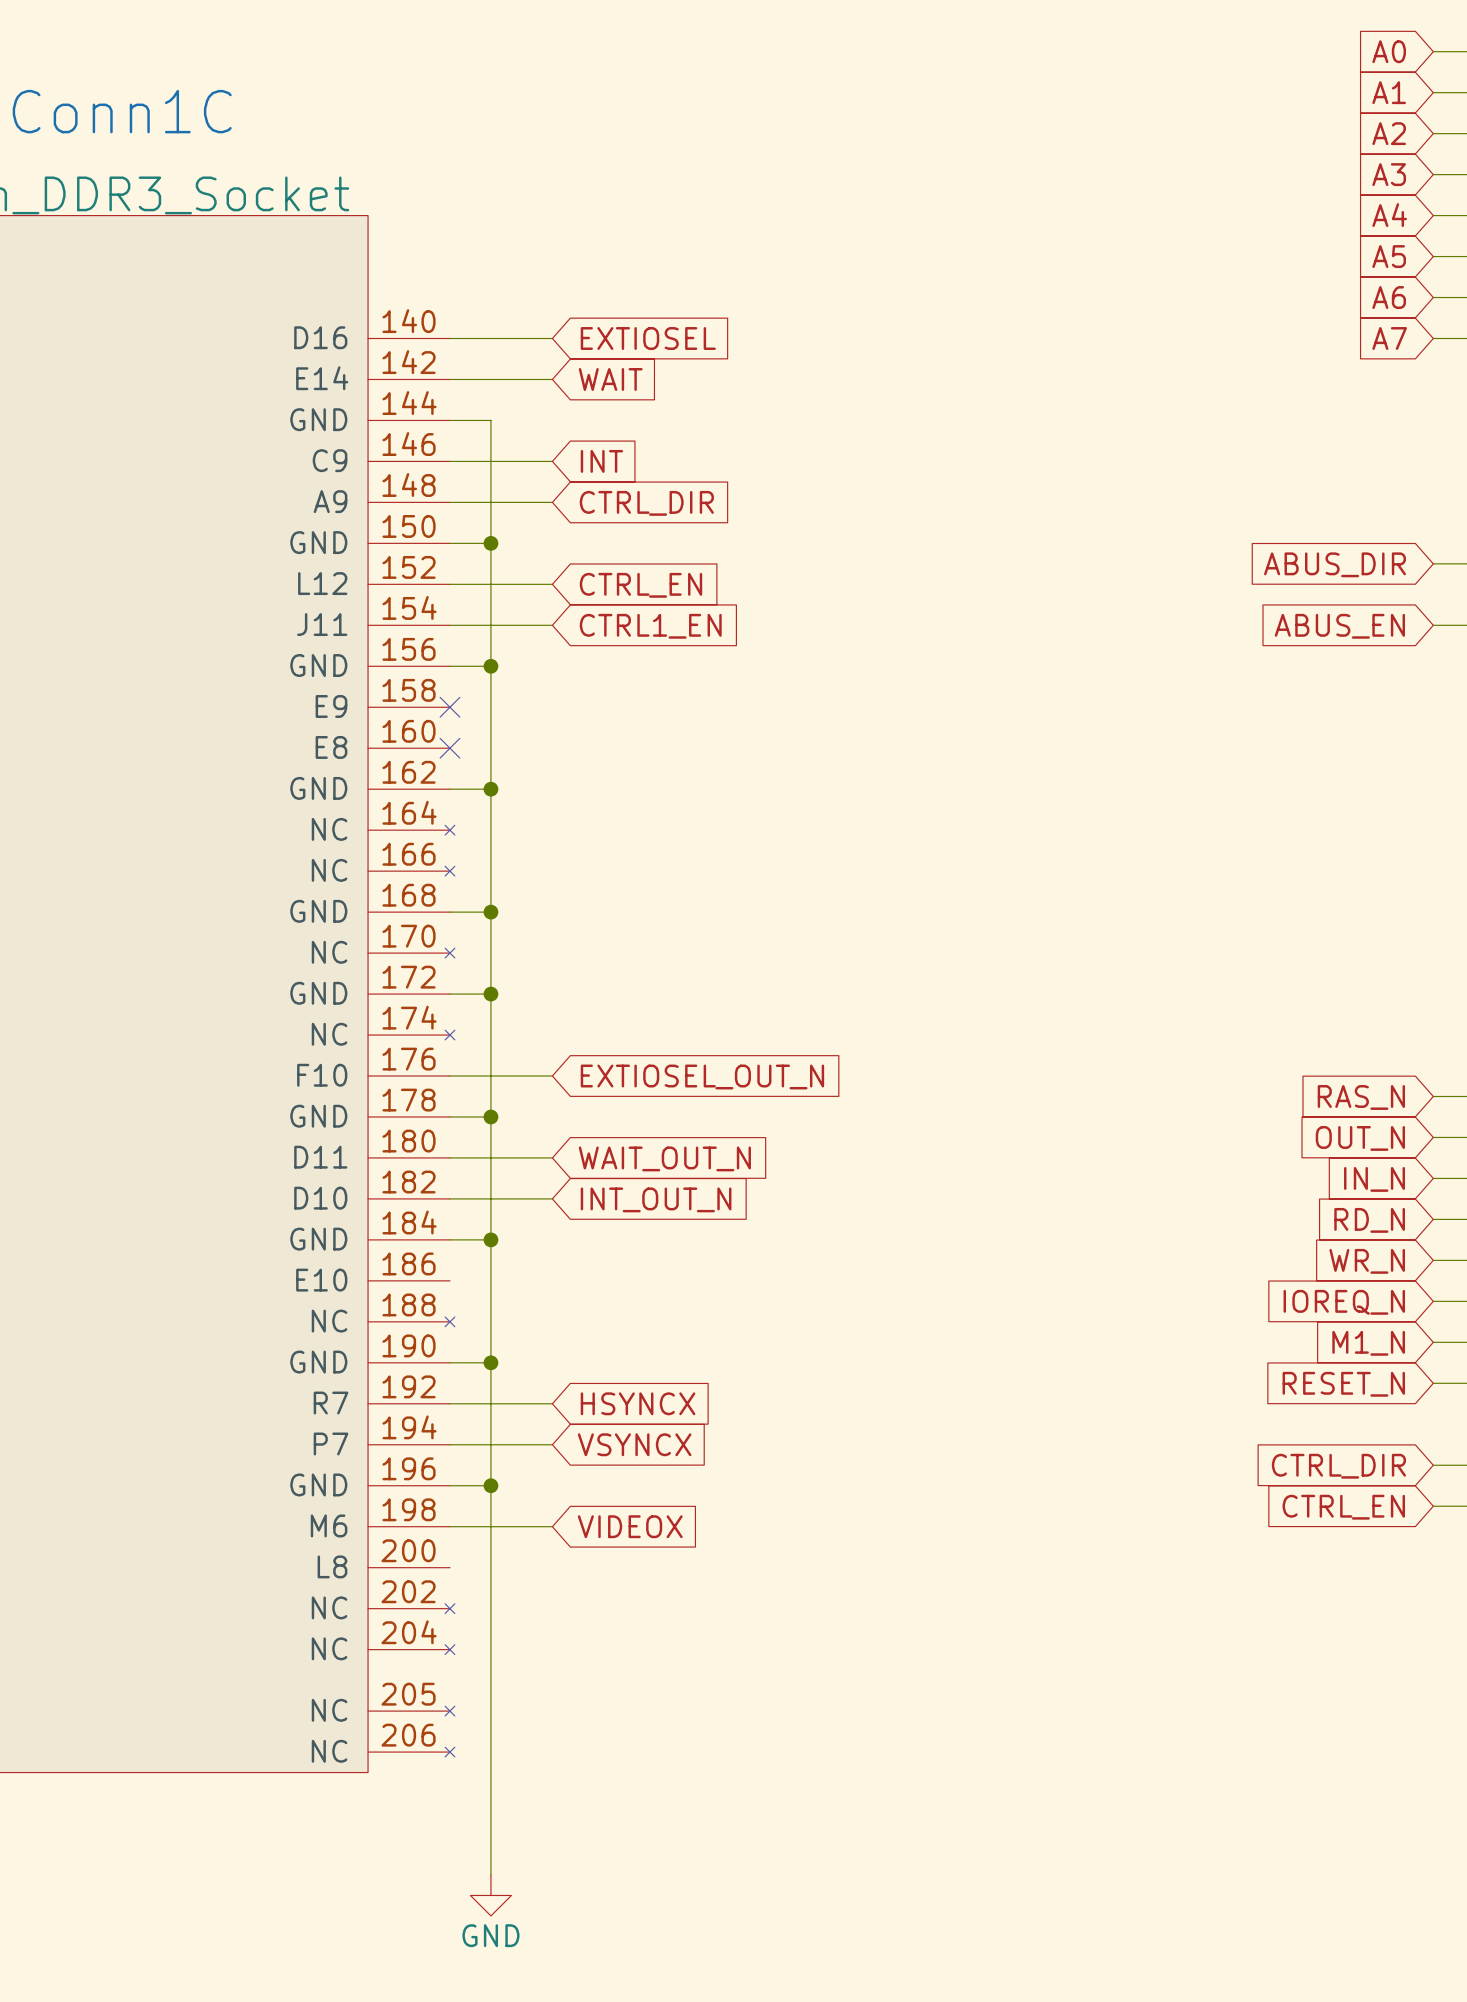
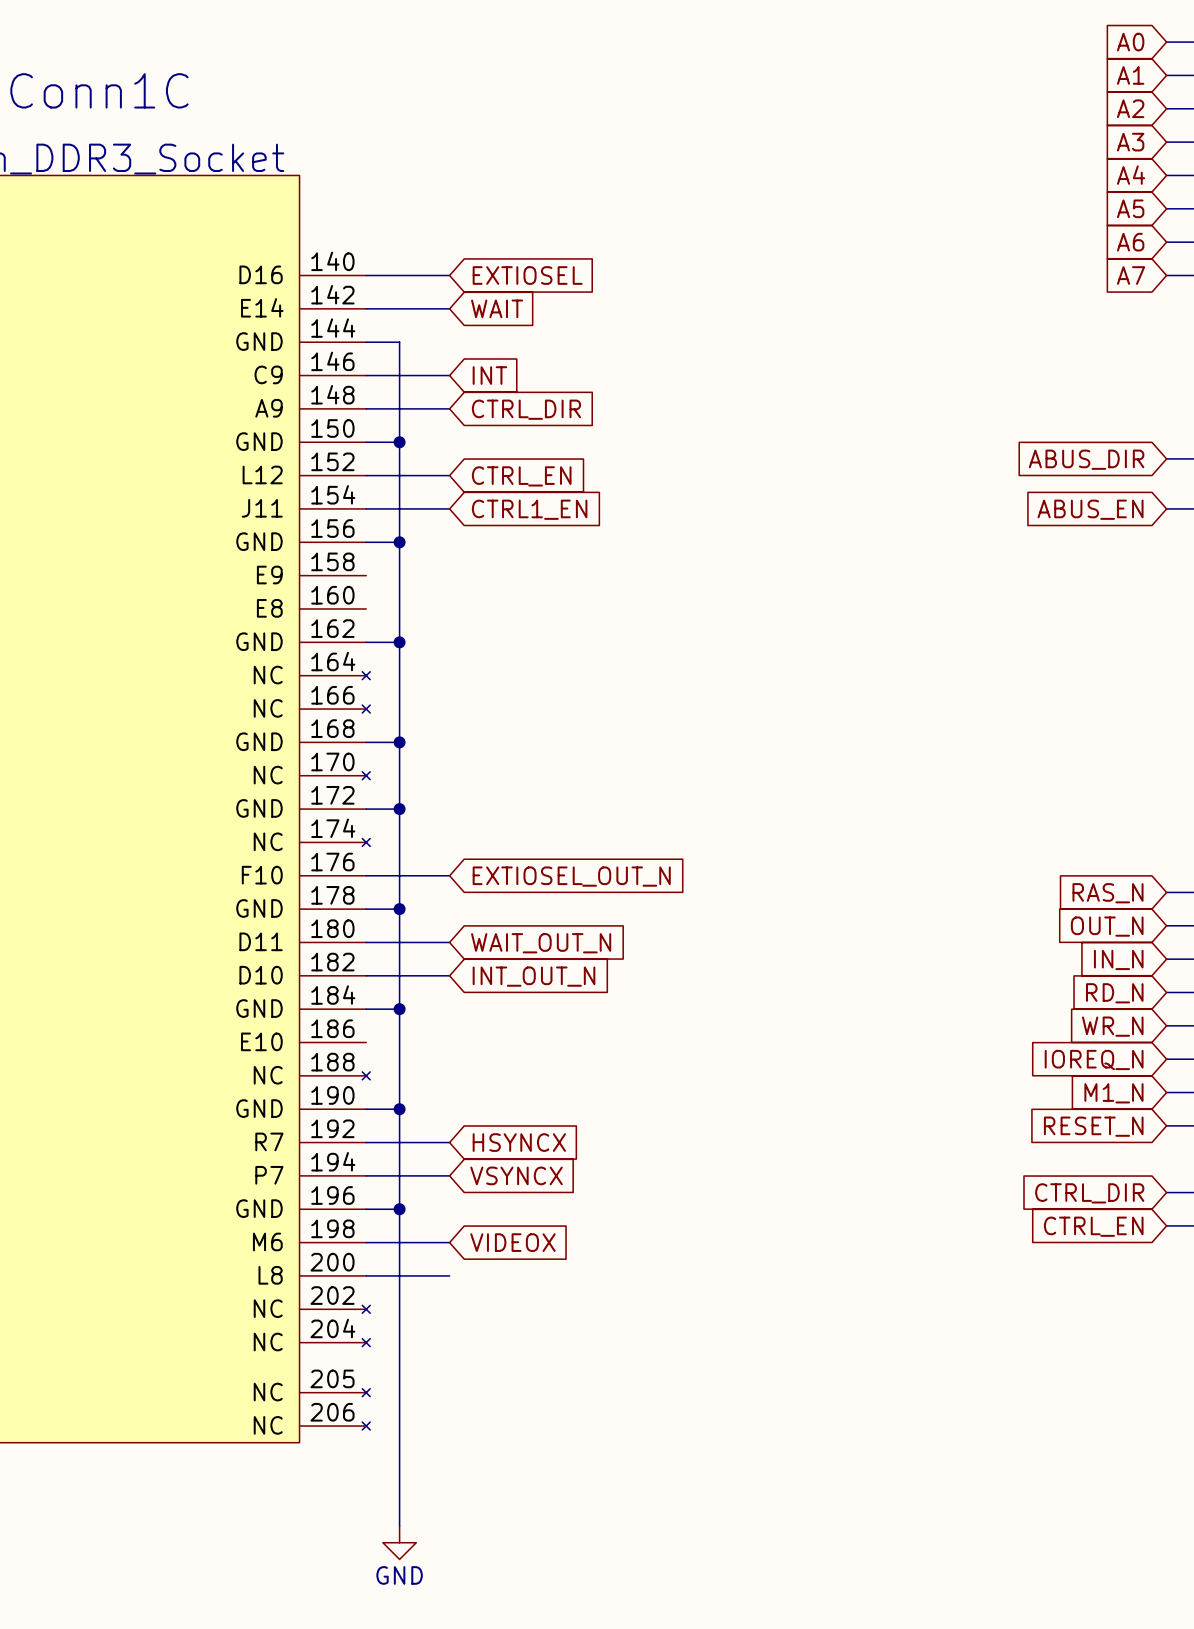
no-connect mark: (449, 707) -> none
no-connect mark: (449, 748) -> none
wire: none -> (366, 1275) (449, 1275)

